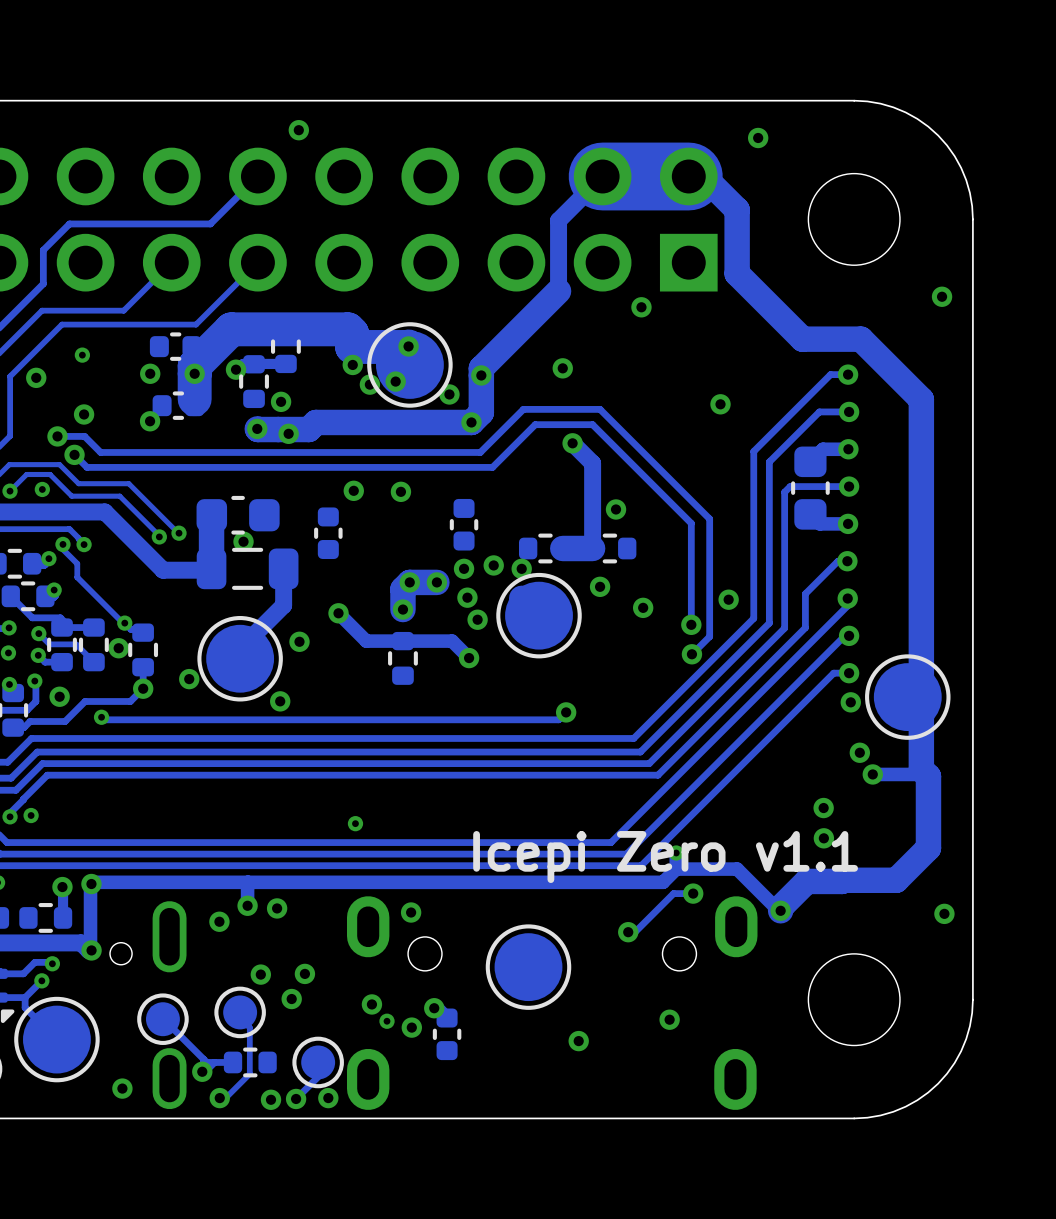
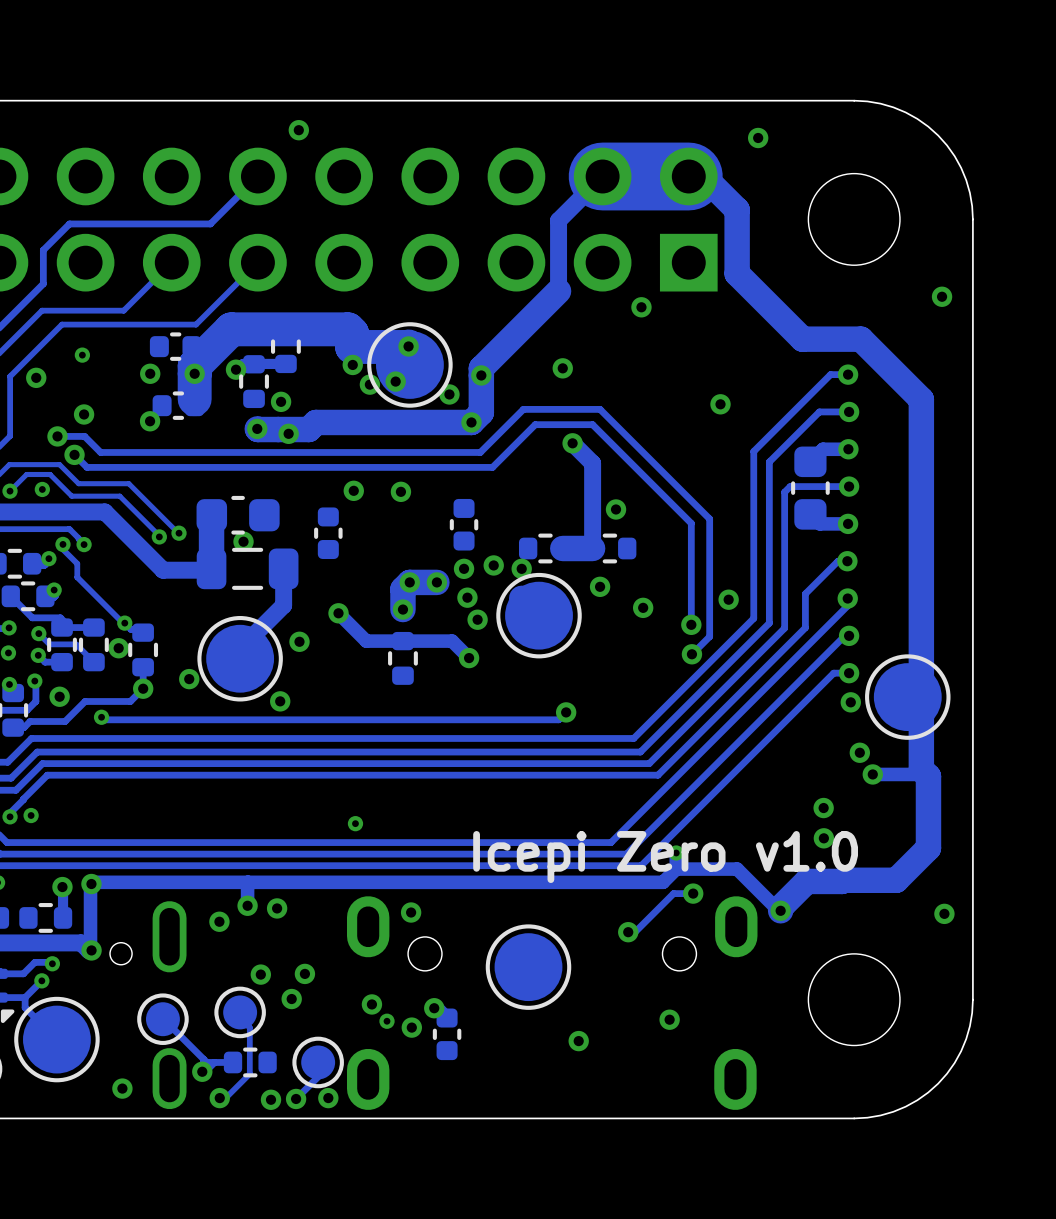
text: Icepi Zero v1.1 (665, 857) -> Icepi Zero v1.0 (665, 857)

